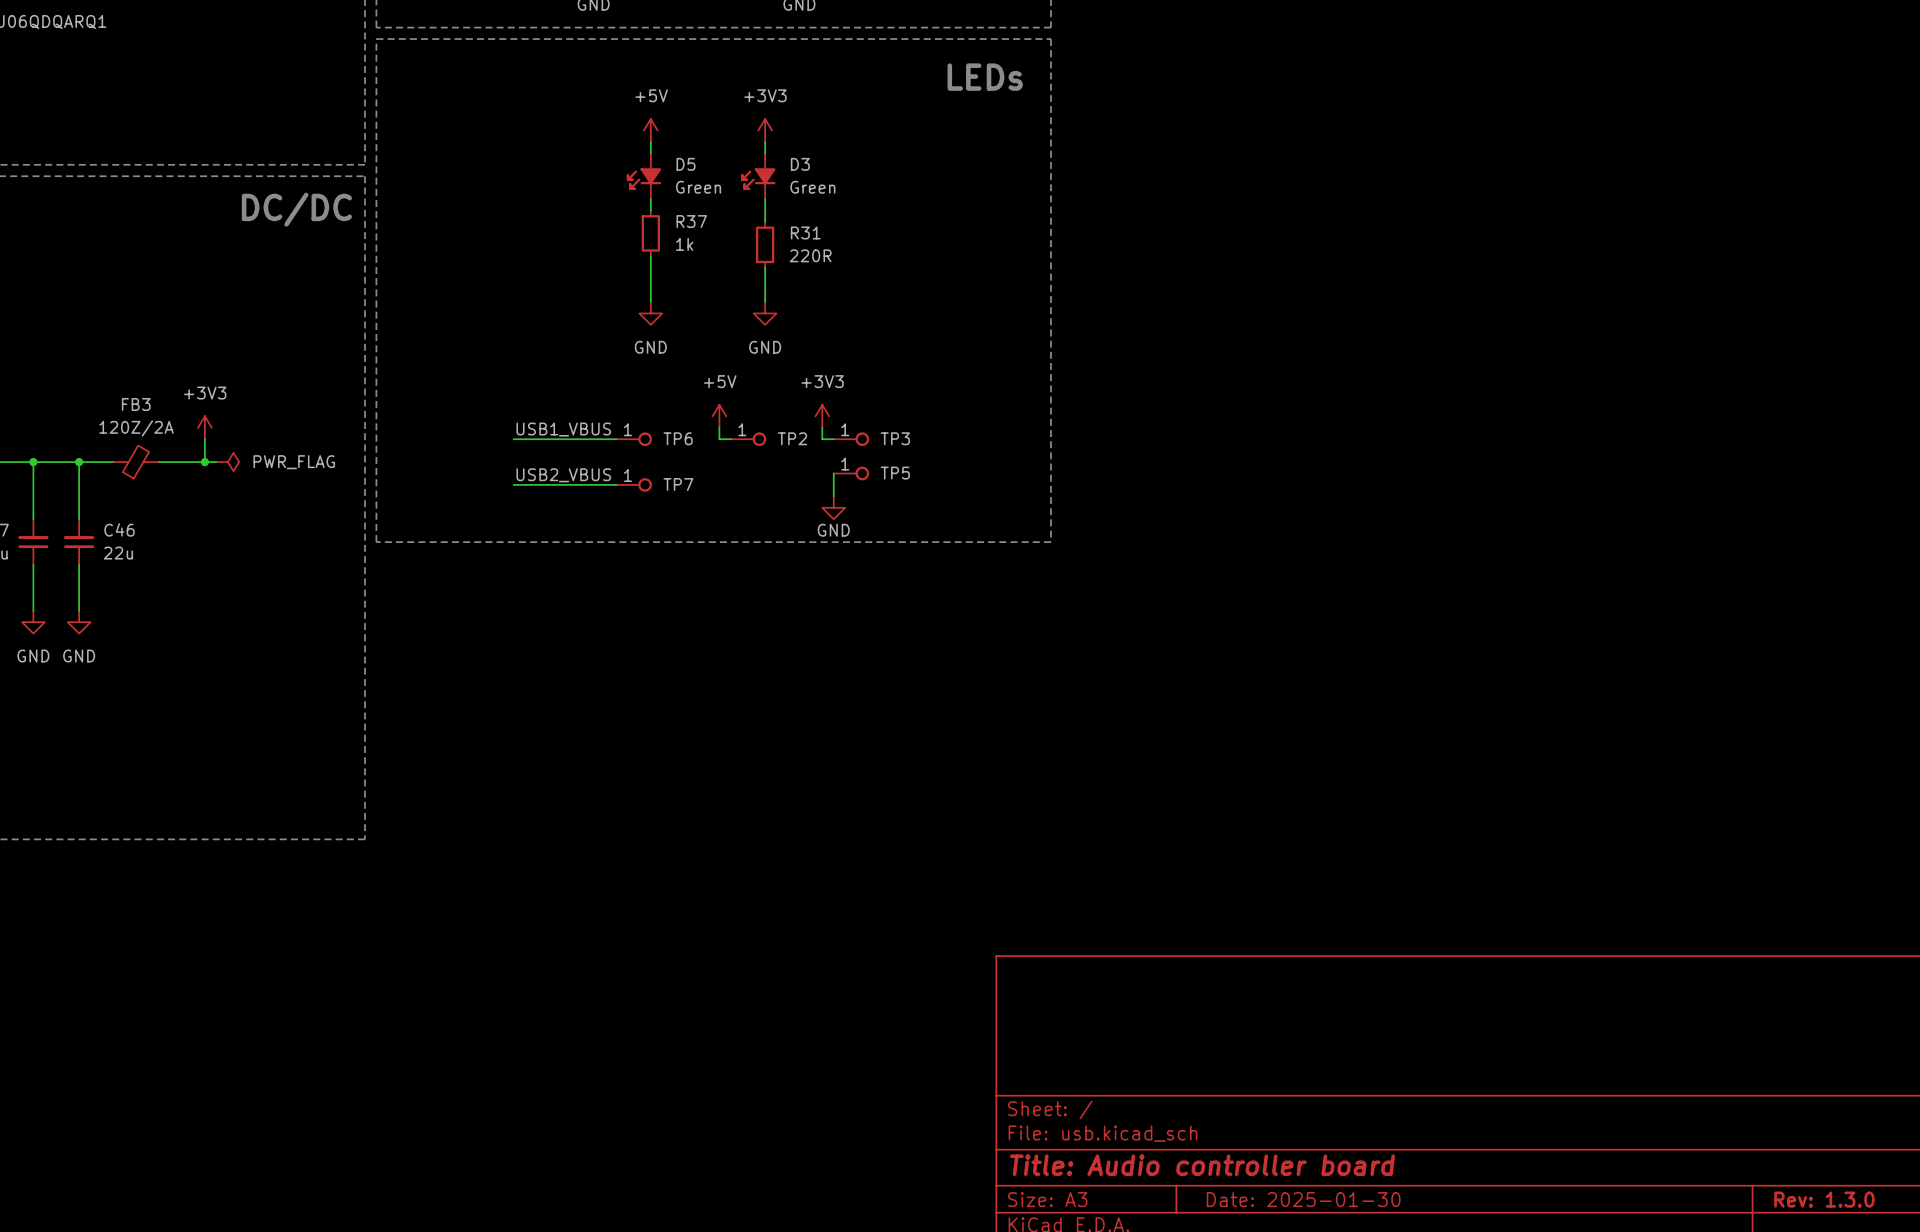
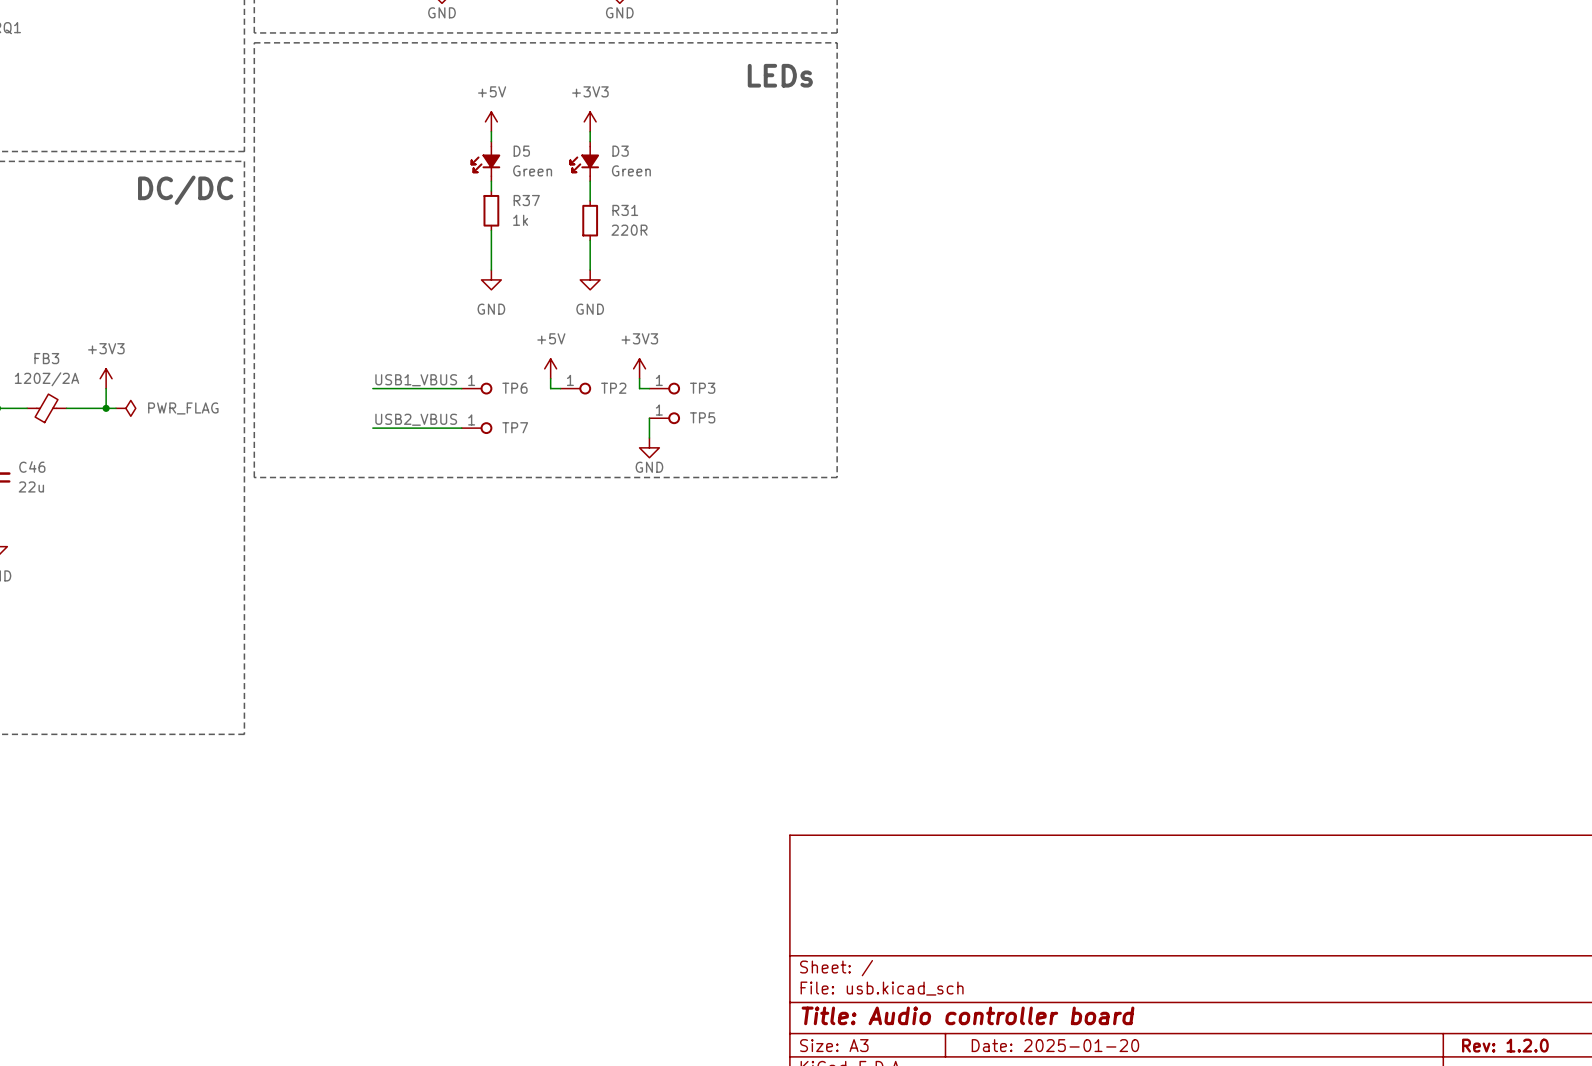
title block: Date: 2025-01-30 (1303, 1199) -> Date: 2025-01-20 (1055, 1045)
title block: Rev: 1.3.0 (1824, 1199) -> Rev: 1.2.0 (1505, 1045)

